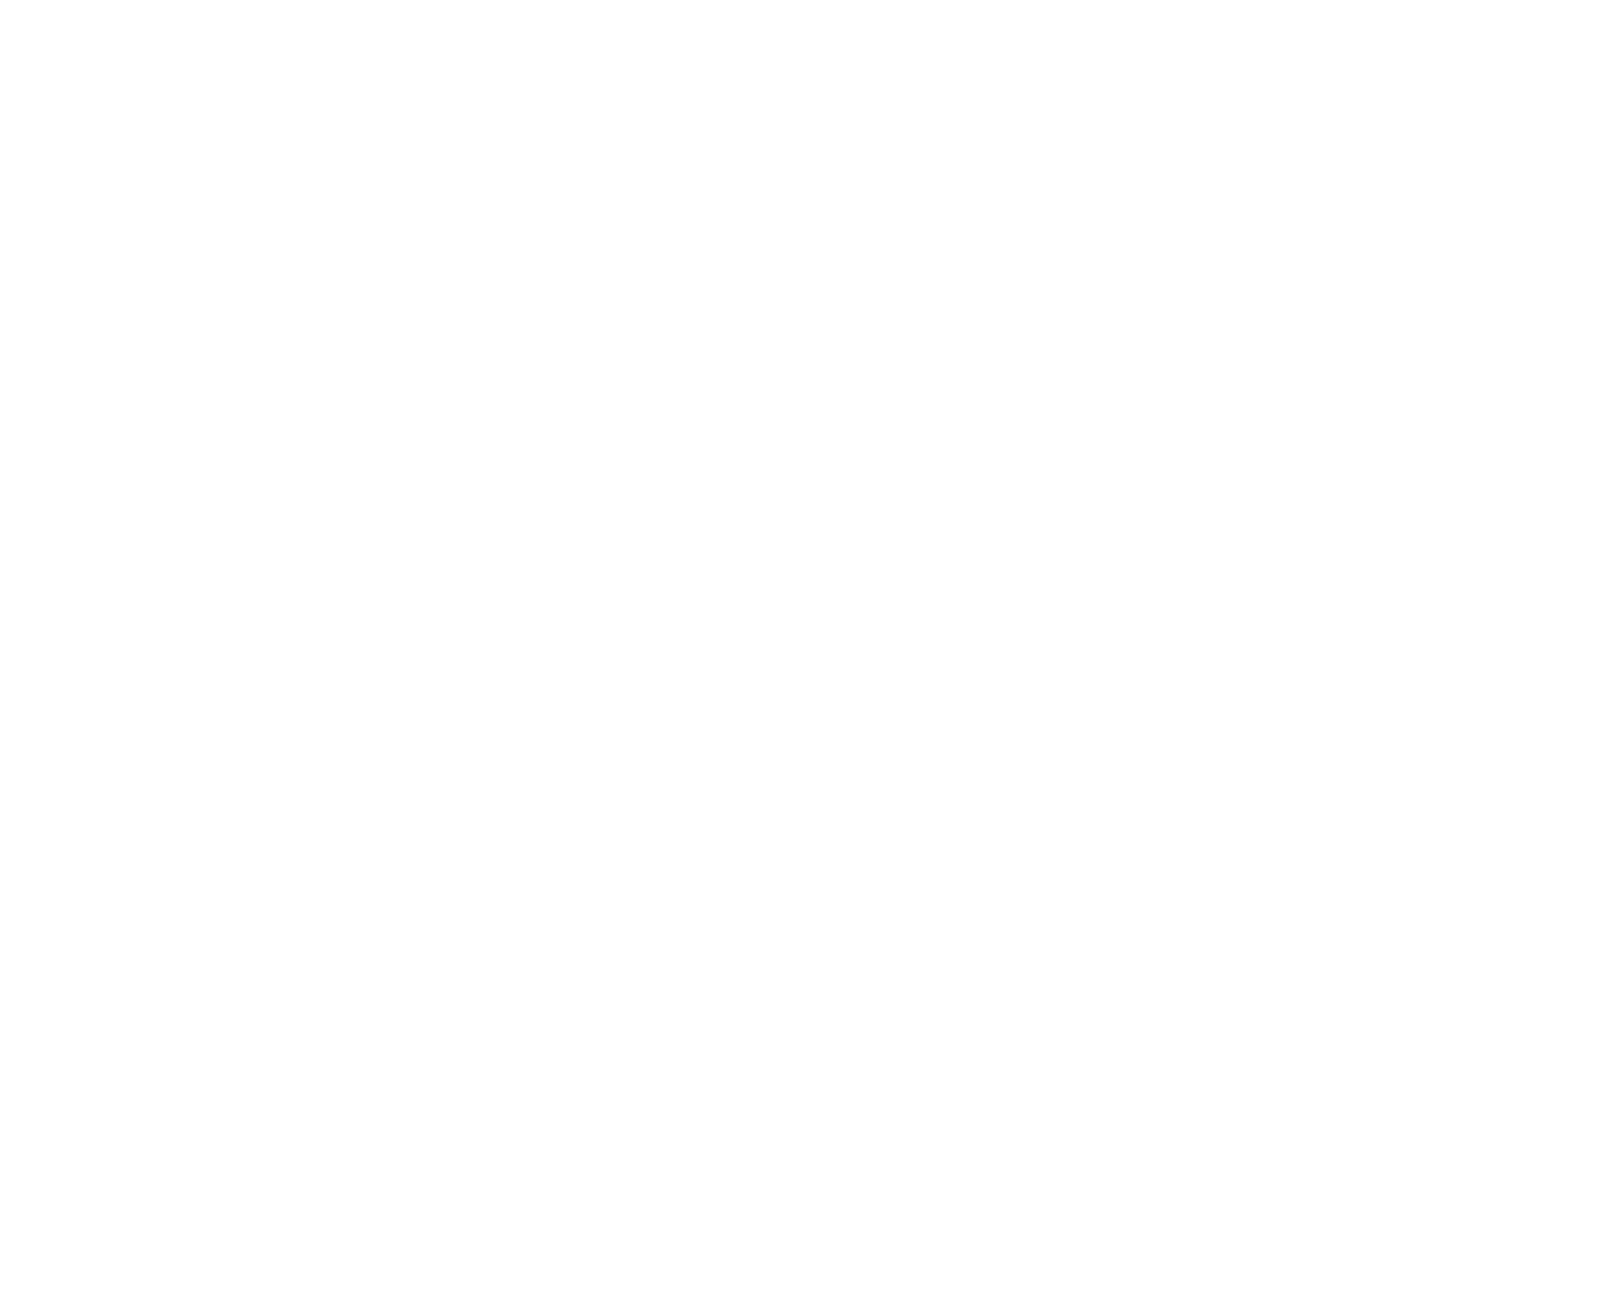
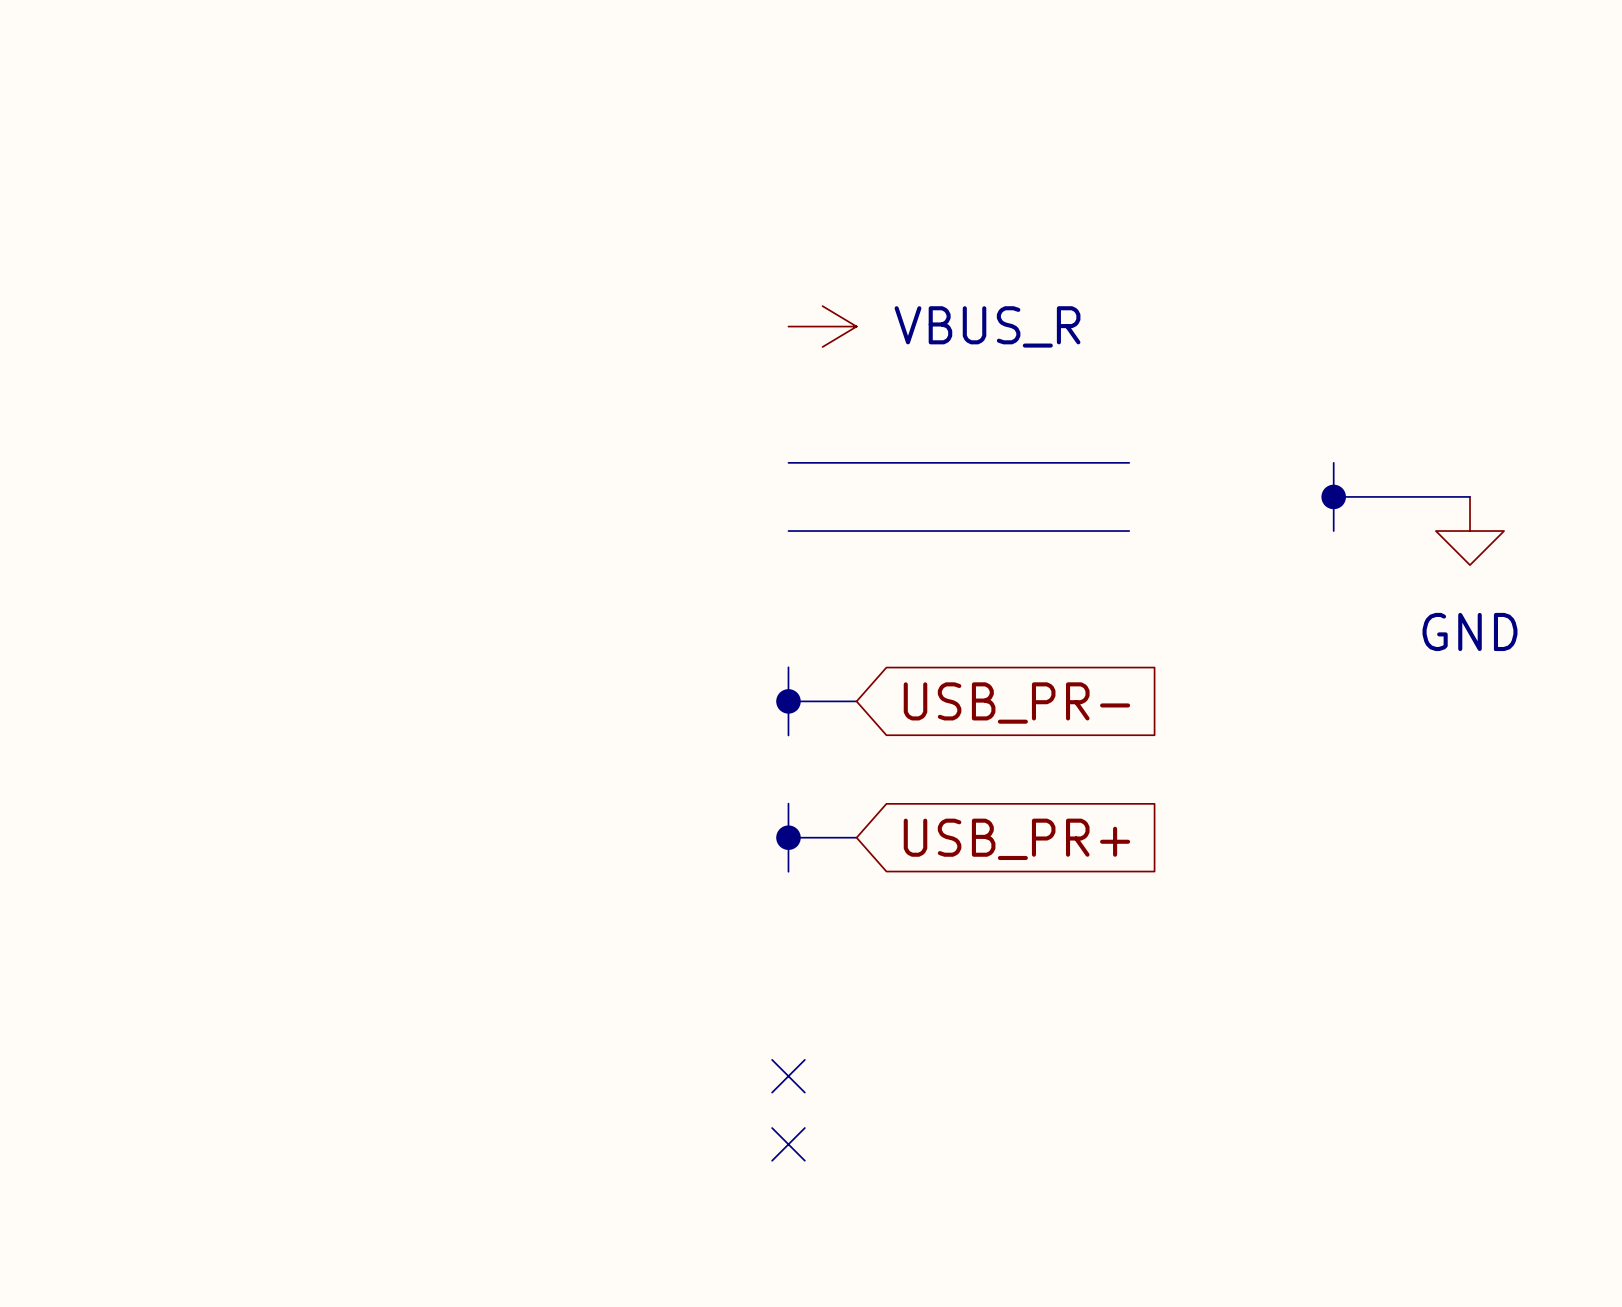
power symbol: none -> VBUS_R (822, 326)
wire: none -> (788, 462) (1129, 462)
wire: none -> (1333, 462) (1333, 531)
wire: none -> (1333, 496) (1469, 496)
junction: none -> (1333, 496)
wire: none -> (788, 531) (1129, 531)
power symbol: none -> GND (1469, 531)
wire: none -> (788, 667) (788, 735)
wire: none -> (788, 701) (856, 701)
junction: none -> (788, 701)
global label: none -> USB_PR- (1016, 703)
wire: none -> (788, 803) (788, 871)
wire: none -> (788, 837) (856, 837)
junction: none -> (788, 837)
global label: none -> USB_PR+ (1016, 839)
no-connect mark: none -> (788, 1076)
no-connect mark: none -> (788, 1144)

